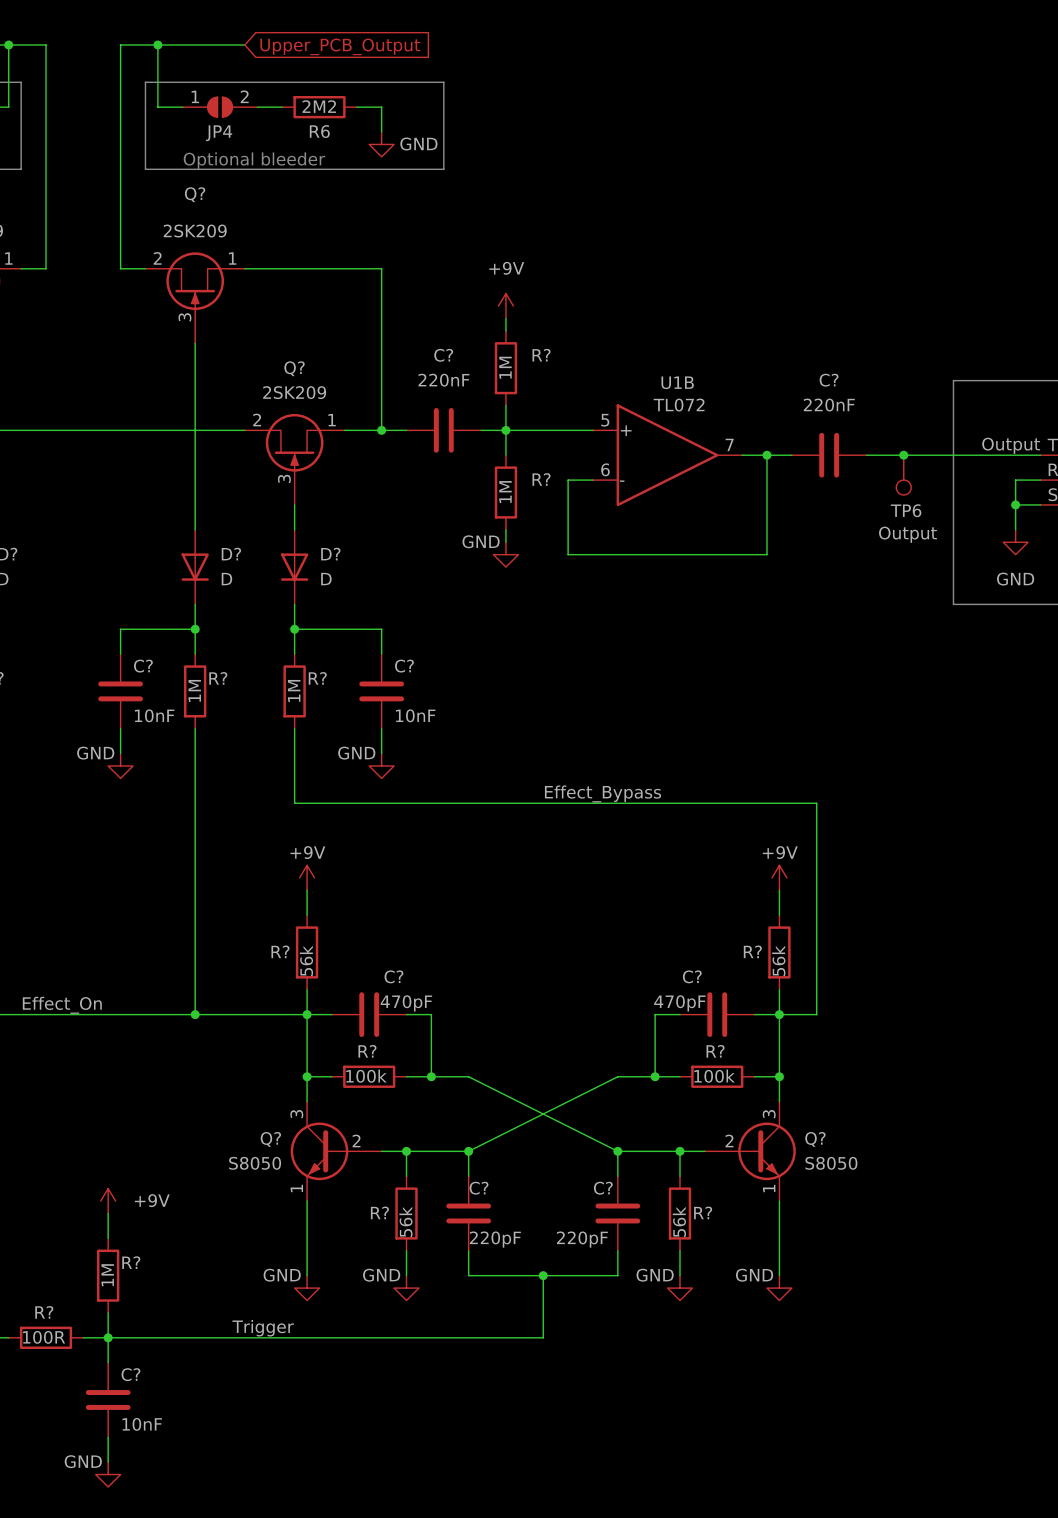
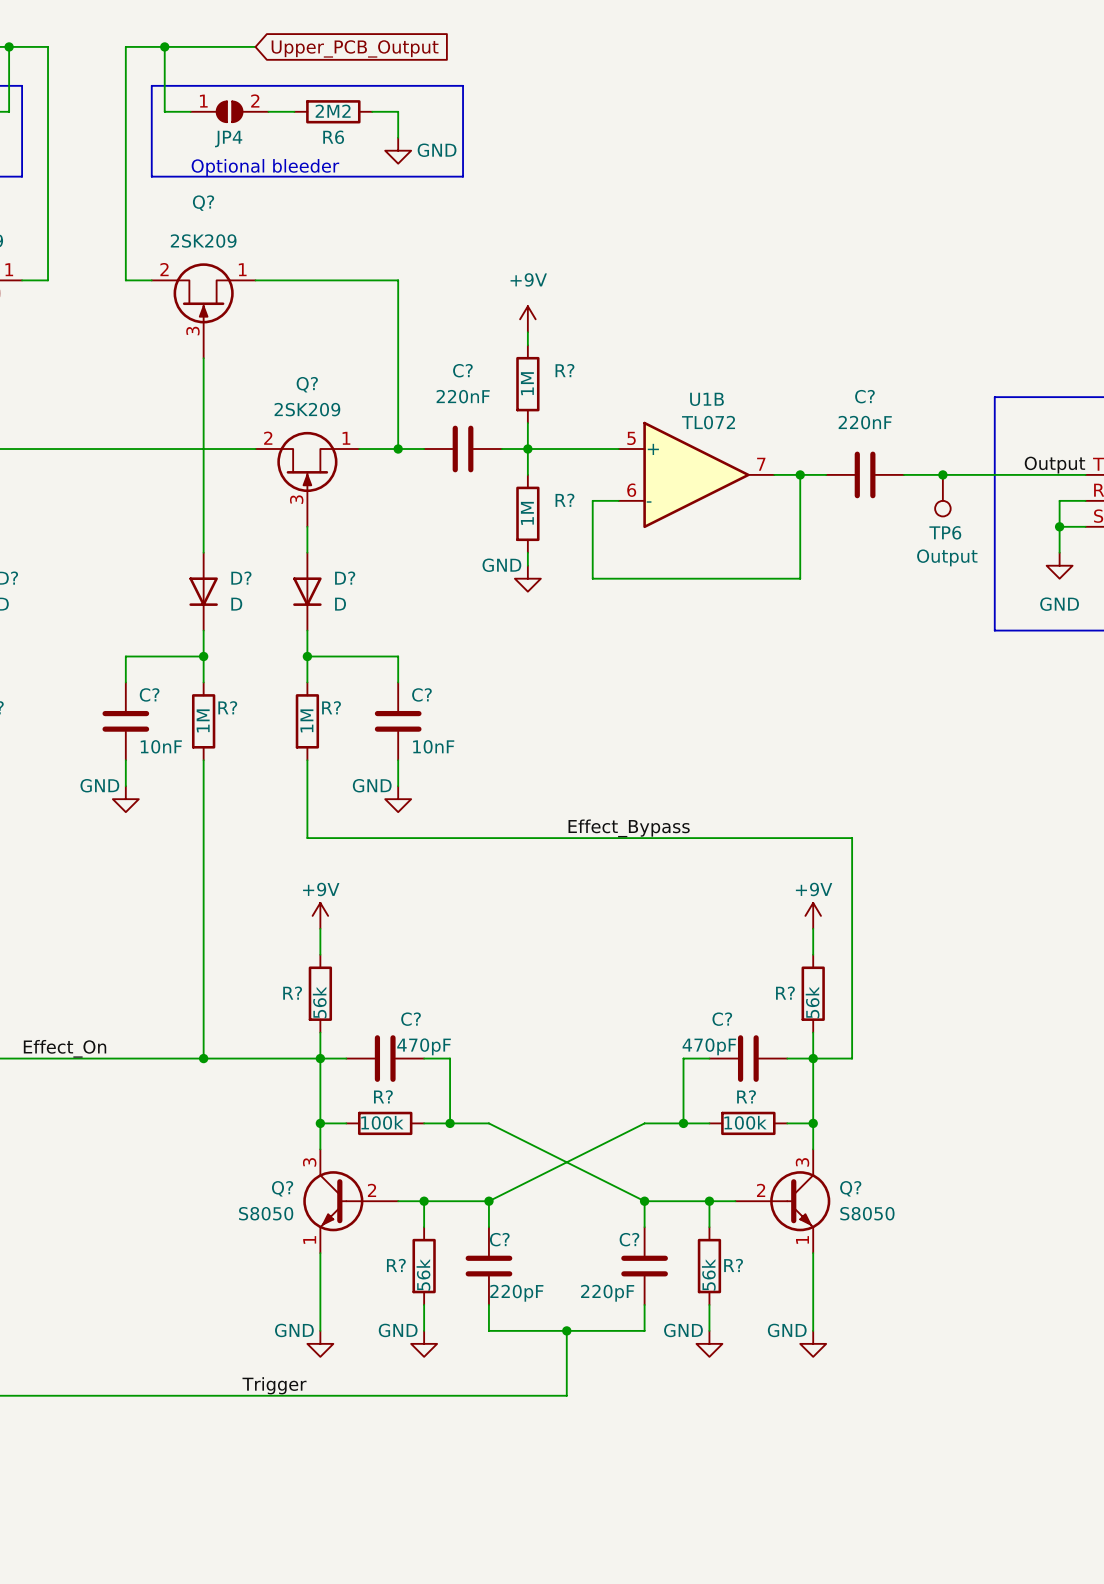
power symbol: +9V (108, 1201) -> none
wire: (108, 1213) (108, 1238) -> none
R?: 1M (108, 1275) -> none
wire: (108, 1312) (108, 1362) -> none
R?: 100R (46, 1337) -> none
junction: (108, 1337) -> none
C?: 10nF (108, 1399) -> none
wire: (108, 1437) (108, 1462) -> none
power symbol: GND (108, 1474) -> none

